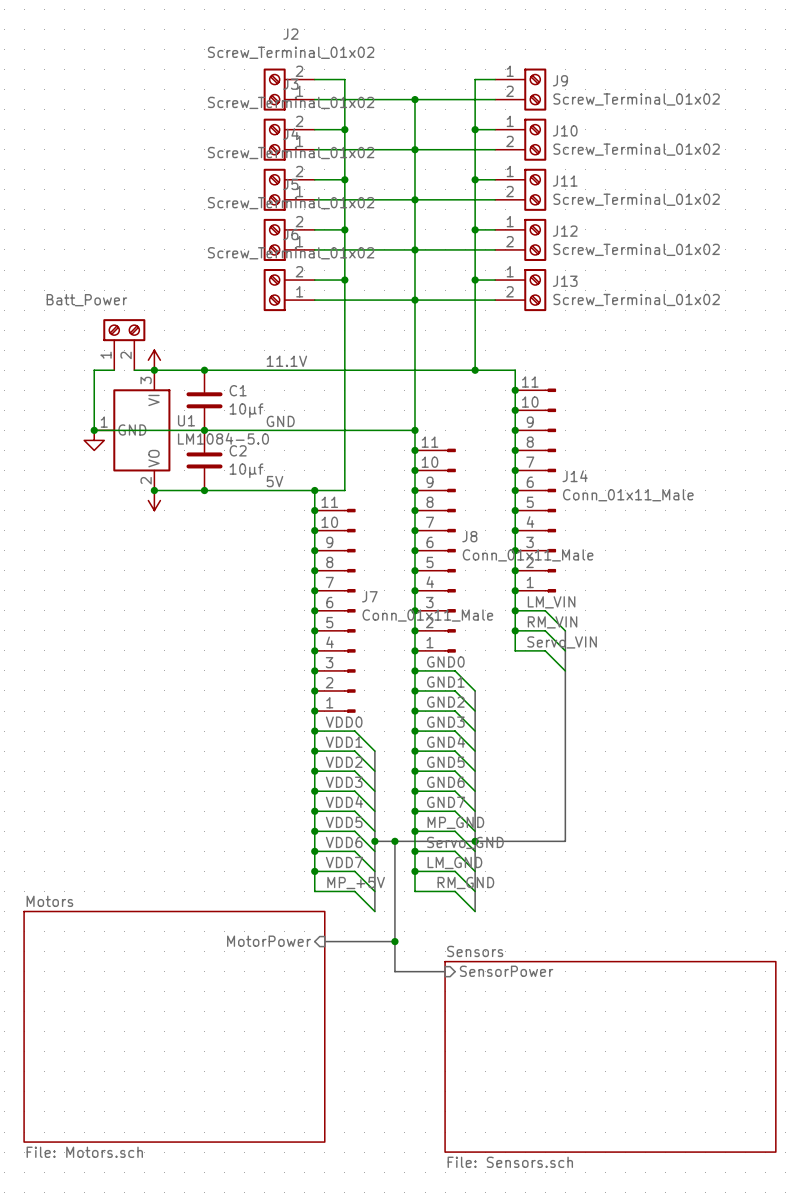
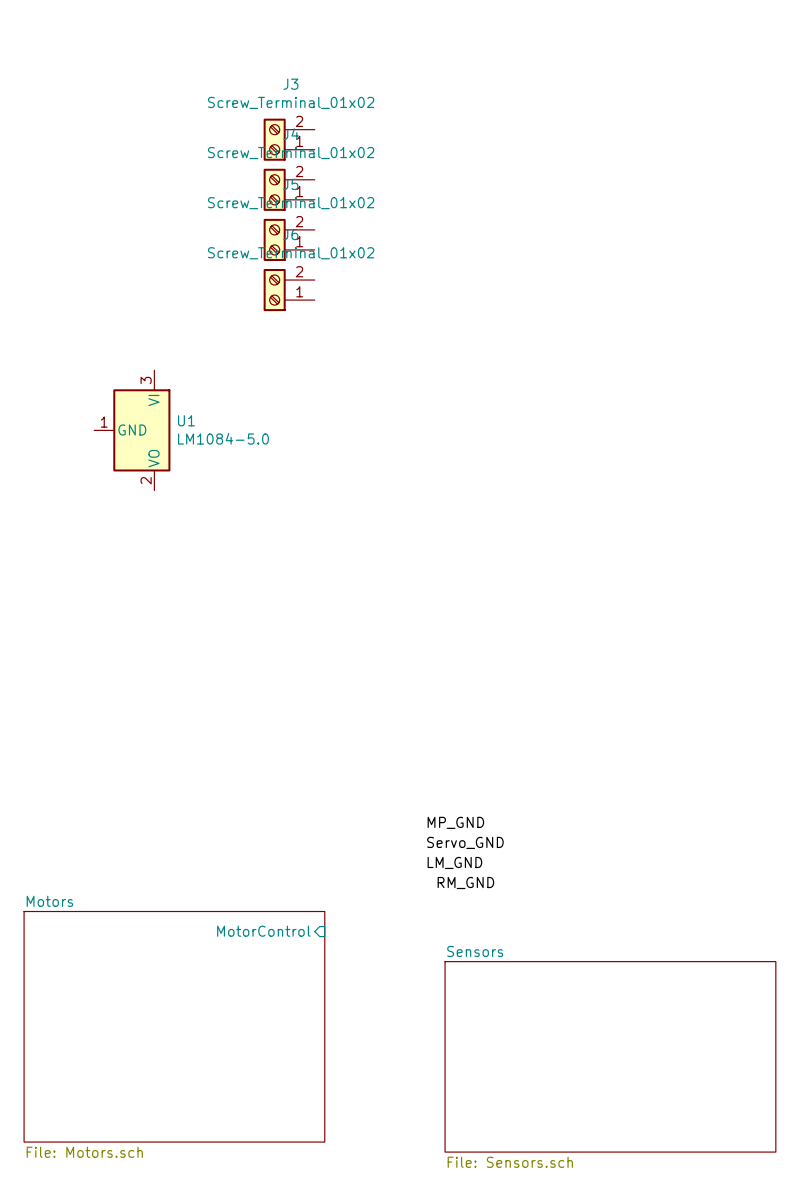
wire: (314, 79) (344, 79) (344, 490) (154, 490) -> none
wire: (495, 79) (475, 79) (475, 370) -> none
J2: Screw_Terminal_01x02 (289, 89) -> none
J9: Screw_Terminal_01x02 (520, 89) -> none
wire: (314, 99) (495, 99) -> none
wire: (414, 99) (414, 891) (455, 891) (475, 911) -> none
junction: (414, 99) -> none
wire: (314, 129) (344, 129) -> none
junction: (344, 129) -> none
wire: (475, 129) (495, 129) -> none
junction: (475, 129) -> none
J10: Screw_Terminal_01x02 (520, 139) -> none
wire: (314, 149) (495, 149) -> none
junction: (414, 149) -> none
wire: (314, 179) (344, 179) -> none
junction: (344, 179) -> none
wire: (475, 179) (495, 179) -> none
junction: (475, 179) -> none
J11: Screw_Terminal_01x02 (520, 189) -> none
wire: (314, 199) (495, 199) -> none
junction: (414, 199) -> none
wire: (314, 229) (344, 229) -> none
junction: (344, 229) -> none
wire: (475, 229) (495, 229) -> none
junction: (475, 229) -> none
J12: Screw_Terminal_01x02 (520, 239) -> none
wire: (314, 249) (495, 249) -> none
junction: (414, 249) -> none
wire: (314, 280) (344, 280) -> none
junction: (344, 280) -> none
wire: (475, 280) (495, 280) -> none
junction: (475, 280) -> none
J13: Screw_Terminal_01x02 (520, 290) -> none
wire: (314, 300) (495, 300) -> none
junction: (414, 300) -> none
part: Batt_Power (124, 344) -> none
power symbol: (154, 360) -> none
label: 11.1V (286, 361) -> none
wire: (114, 370) (94, 370) (94, 430) (414, 430) -> none
wire: (134, 370) (515, 370) (515, 650) (545, 650) (565, 670) -> none
junction: (154, 370) -> none
junction: (204, 370) -> none
junction: (475, 370) -> none
junction: (515, 390) -> none
C1: 10μf (204, 400) -> none
junction: (515, 410) -> none
label: GND (280, 421) -> none
junction: (94, 430) -> none
junction: (204, 430) -> none
junction: (414, 430) -> none
junction: (515, 430) -> none
power symbol: (94, 440) -> none
junction: (414, 450) -> none
junction: (515, 450) -> none
C2: 10μf (204, 460) -> none
junction: (414, 470) -> none
junction: (515, 470) -> none
label: 5V (274, 481) -> none
junction: (154, 490) -> none
junction: (204, 490) -> none
wire: (314, 490) (314, 891) (354, 891) (374, 911) -> none
junction: (314, 490) -> none
junction: (414, 490) -> none
junction: (515, 490) -> none
J14: Conn_01x11_Male (535, 490) -> none
power symbol: (154, 500) -> none
junction: (314, 510) -> none
junction: (414, 510) -> none
junction: (515, 510) -> none
junction: (314, 530) -> none
junction: (414, 530) -> none
junction: (515, 530) -> none
junction: (314, 550) -> none
junction: (414, 550) -> none
J8: Conn_01x11_Male (435, 550) -> none
junction: (515, 550) -> none
junction: (314, 570) -> none
junction: (414, 570) -> none
junction: (515, 570) -> none
junction: (314, 590) -> none
junction: (414, 590) -> none
junction: (515, 590) -> none
label: LM_VIN (551, 602) -> none
junction: (314, 610) -> none
J7: Conn_01x11_Male (335, 610) -> none
junction: (414, 610) -> none
wire: (515, 610) (545, 610) (565, 630) -> none
junction: (515, 610) -> none
label: RM_VIN (552, 622) -> none
junction: (314, 630) -> none
junction: (414, 630) -> none
wire: (515, 630) (545, 630) (565, 650) -> none
junction: (515, 630) -> none
bus: (565, 630) (565, 841) (374, 841) -> none
label: Servo_VIN (562, 642) -> none
junction: (314, 650) -> none
junction: (414, 650) -> none
label: GND0 (445, 662) -> none
junction: (314, 670) -> none
wire: (414, 670) (455, 670) (475, 690) -> none
junction: (414, 670) -> none
label: GND1 (445, 682) -> none
junction: (314, 690) -> none
wire: (414, 690) (455, 690) (475, 711) -> none
junction: (414, 690) -> none
bus: (475, 690) (475, 911) -> none
label: GND2 (445, 702) -> none
junction: (314, 711) -> none
wire: (414, 711) (455, 711) (475, 731) -> none
junction: (414, 711) -> none
label: VDD0 (344, 722) -> none
label: GND3 (445, 722) -> none
wire: (314, 731) (354, 731) (374, 751) -> none
junction: (314, 731) -> none
wire: (414, 731) (455, 731) (475, 751) -> none
junction: (414, 731) -> none
label: GND4 (446, 741) -> none
label: VDD1 (344, 742) -> none
wire: (314, 751) (354, 751) (374, 771) -> none
junction: (314, 751) -> none
bus: (374, 751) (374, 911) -> none
wire: (414, 751) (455, 751) (475, 771) -> none
junction: (414, 751) -> none
label: VDD2 (344, 762) -> none
label: GND5 (445, 762) -> none
wire: (314, 771) (354, 771) (374, 791) -> none
junction: (314, 771) -> none
wire: (414, 771) (455, 771) (475, 791) -> none
junction: (414, 771) -> none
label: VDD3 (344, 782) -> none
label: GND6 (445, 782) -> none
wire: (314, 791) (354, 791) (374, 811) -> none
junction: (314, 791) -> none
wire: (414, 791) (455, 791) (475, 811) -> none
junction: (414, 791) -> none
label: VDD4 (344, 802) -> none
label: GND7 (446, 802) -> none
wire: (314, 811) (354, 811) (374, 831) -> none
junction: (314, 811) -> none
wire: (414, 811) (455, 811) (475, 831) -> none
junction: (414, 811) -> none
label: VDD5 (344, 822) -> none
wire: (314, 831) (354, 831) (374, 851) -> none
junction: (314, 831) -> none
wire: (414, 831) (455, 831) (475, 851) -> none
junction: (414, 831) -> none
junction: (374, 841) -> none
bus: (394, 841) (394, 971) (445, 971) -> none
junction: (394, 841) -> none
junction: (475, 841) -> none
label: VDD6 (344, 842) -> none
wire: (314, 851) (354, 851) (374, 871) -> none
junction: (314, 851) -> none
wire: (414, 851) (455, 851) (475, 871) -> none
junction: (414, 851) -> none
label: VDD7 (344, 862) -> none
wire: (314, 871) (354, 871) (374, 891) -> none
junction: (314, 871) -> none
wire: (414, 871) (455, 871) (475, 891) -> none
junction: (414, 871) -> none
label: MP_+5V (356, 882) -> none
sheet pin: MotorPower (269, 941) -> MotorControl (263, 931)
bus: (324, 941) (394, 941) -> none
junction: (394, 941) -> none
sheet pin: SensorPower (506, 971) -> none

